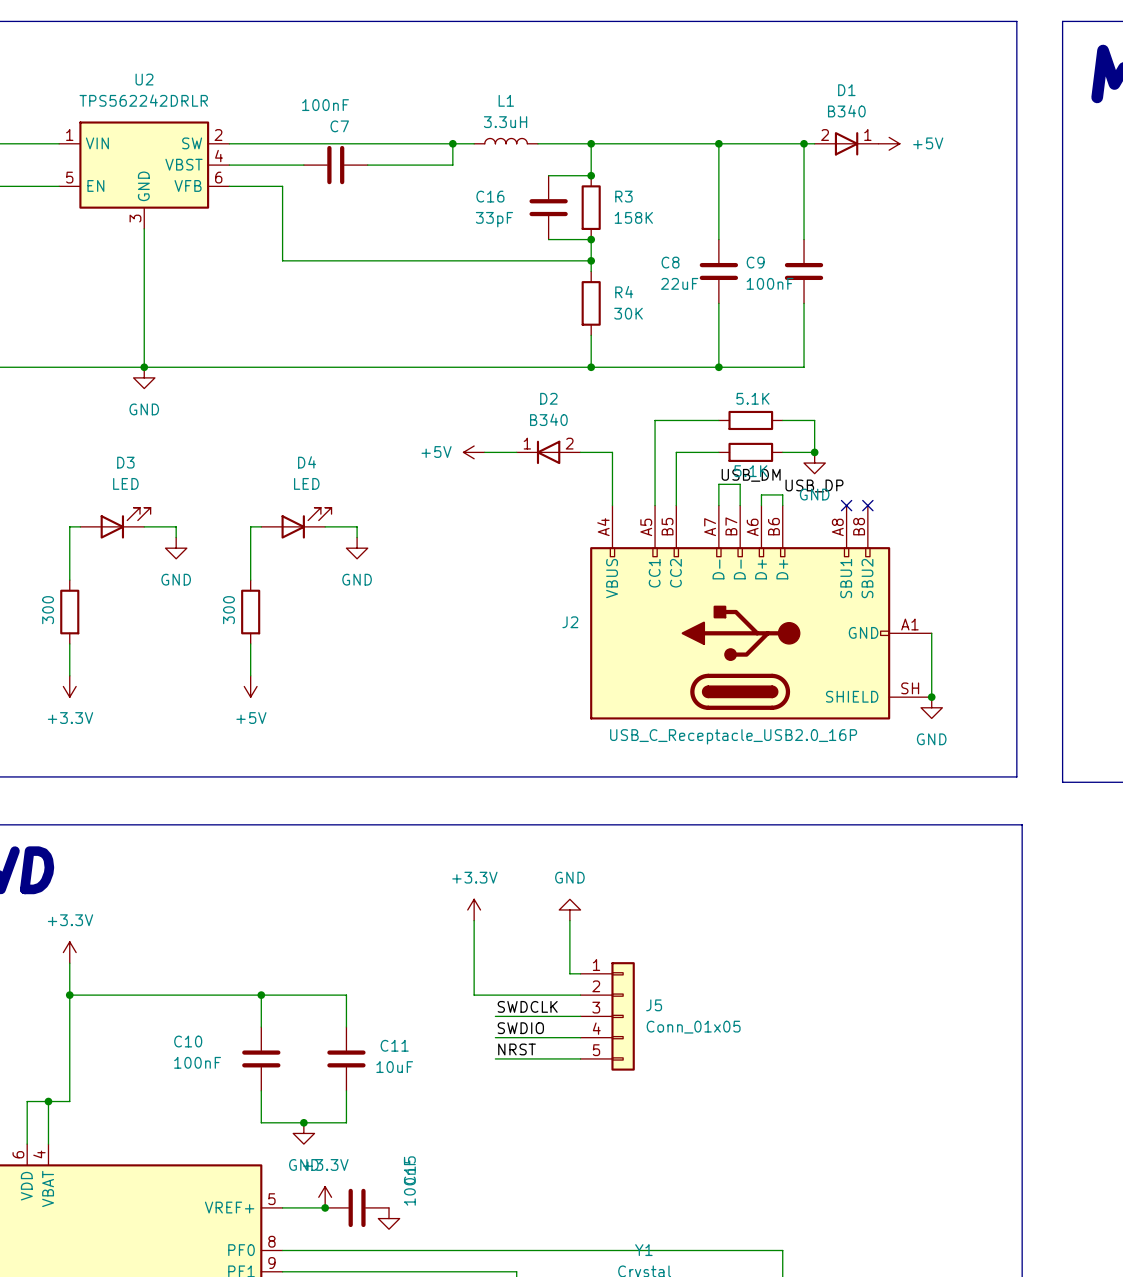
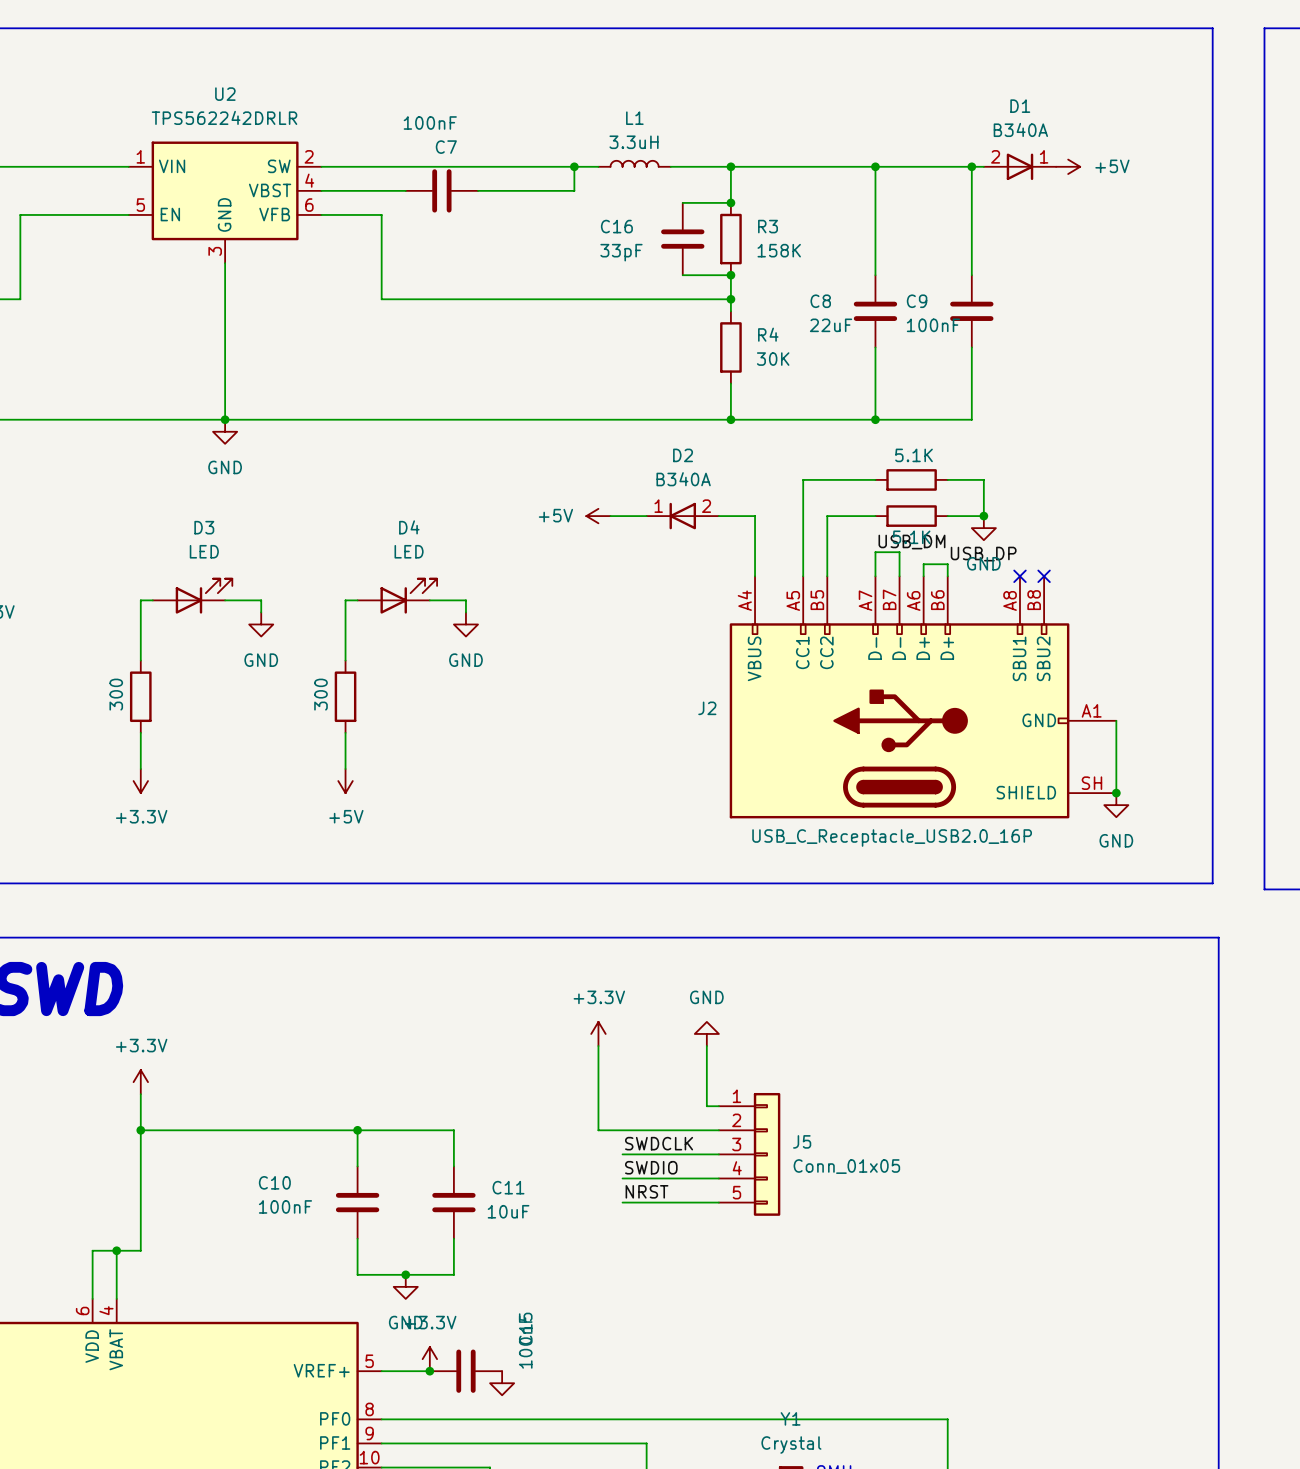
D1 value: B340 (846, 111) -> B340A (1020, 129)
D2 value: B340 (548, 419) -> B340A (683, 479)

